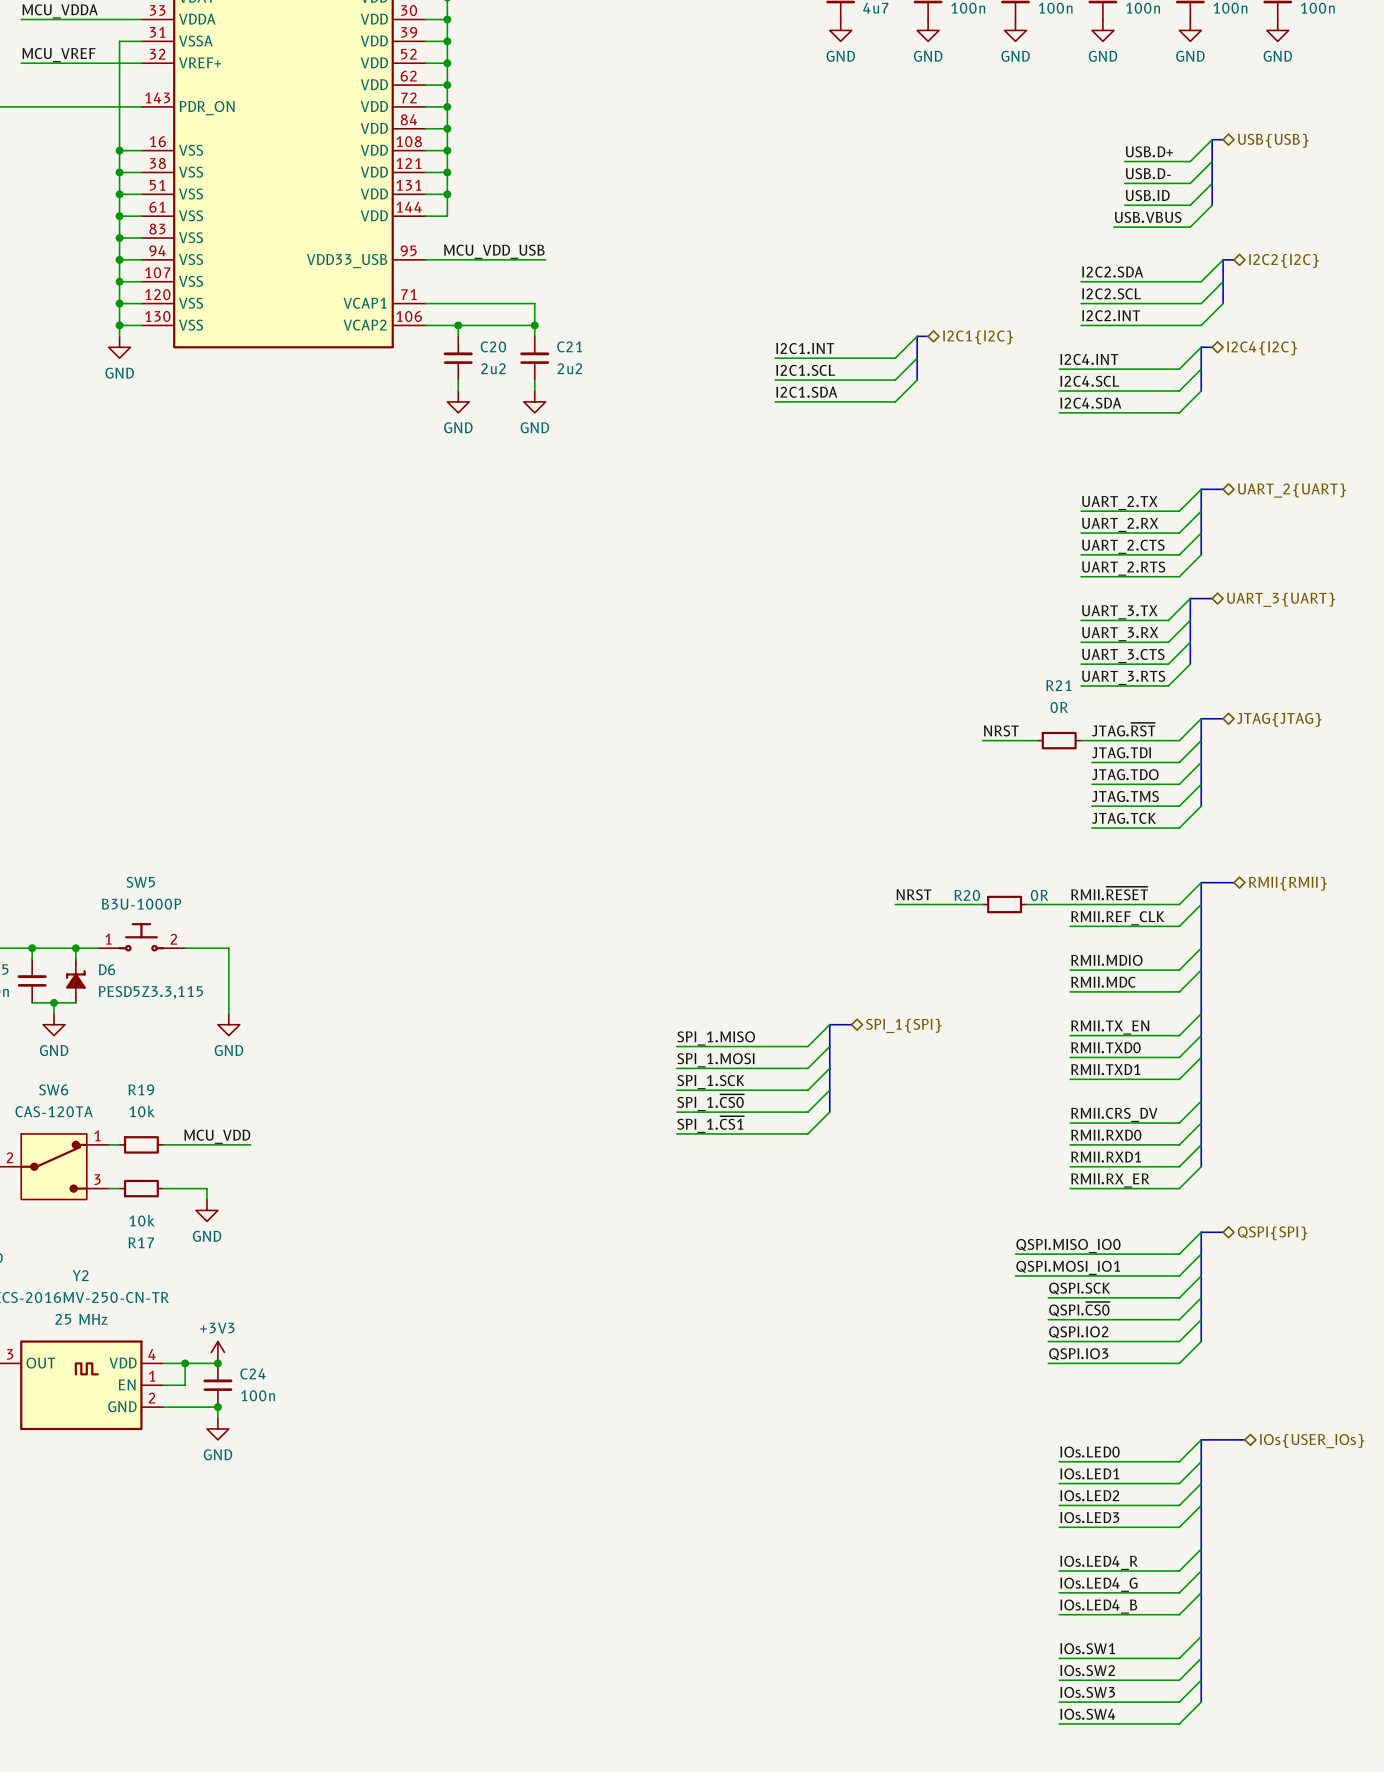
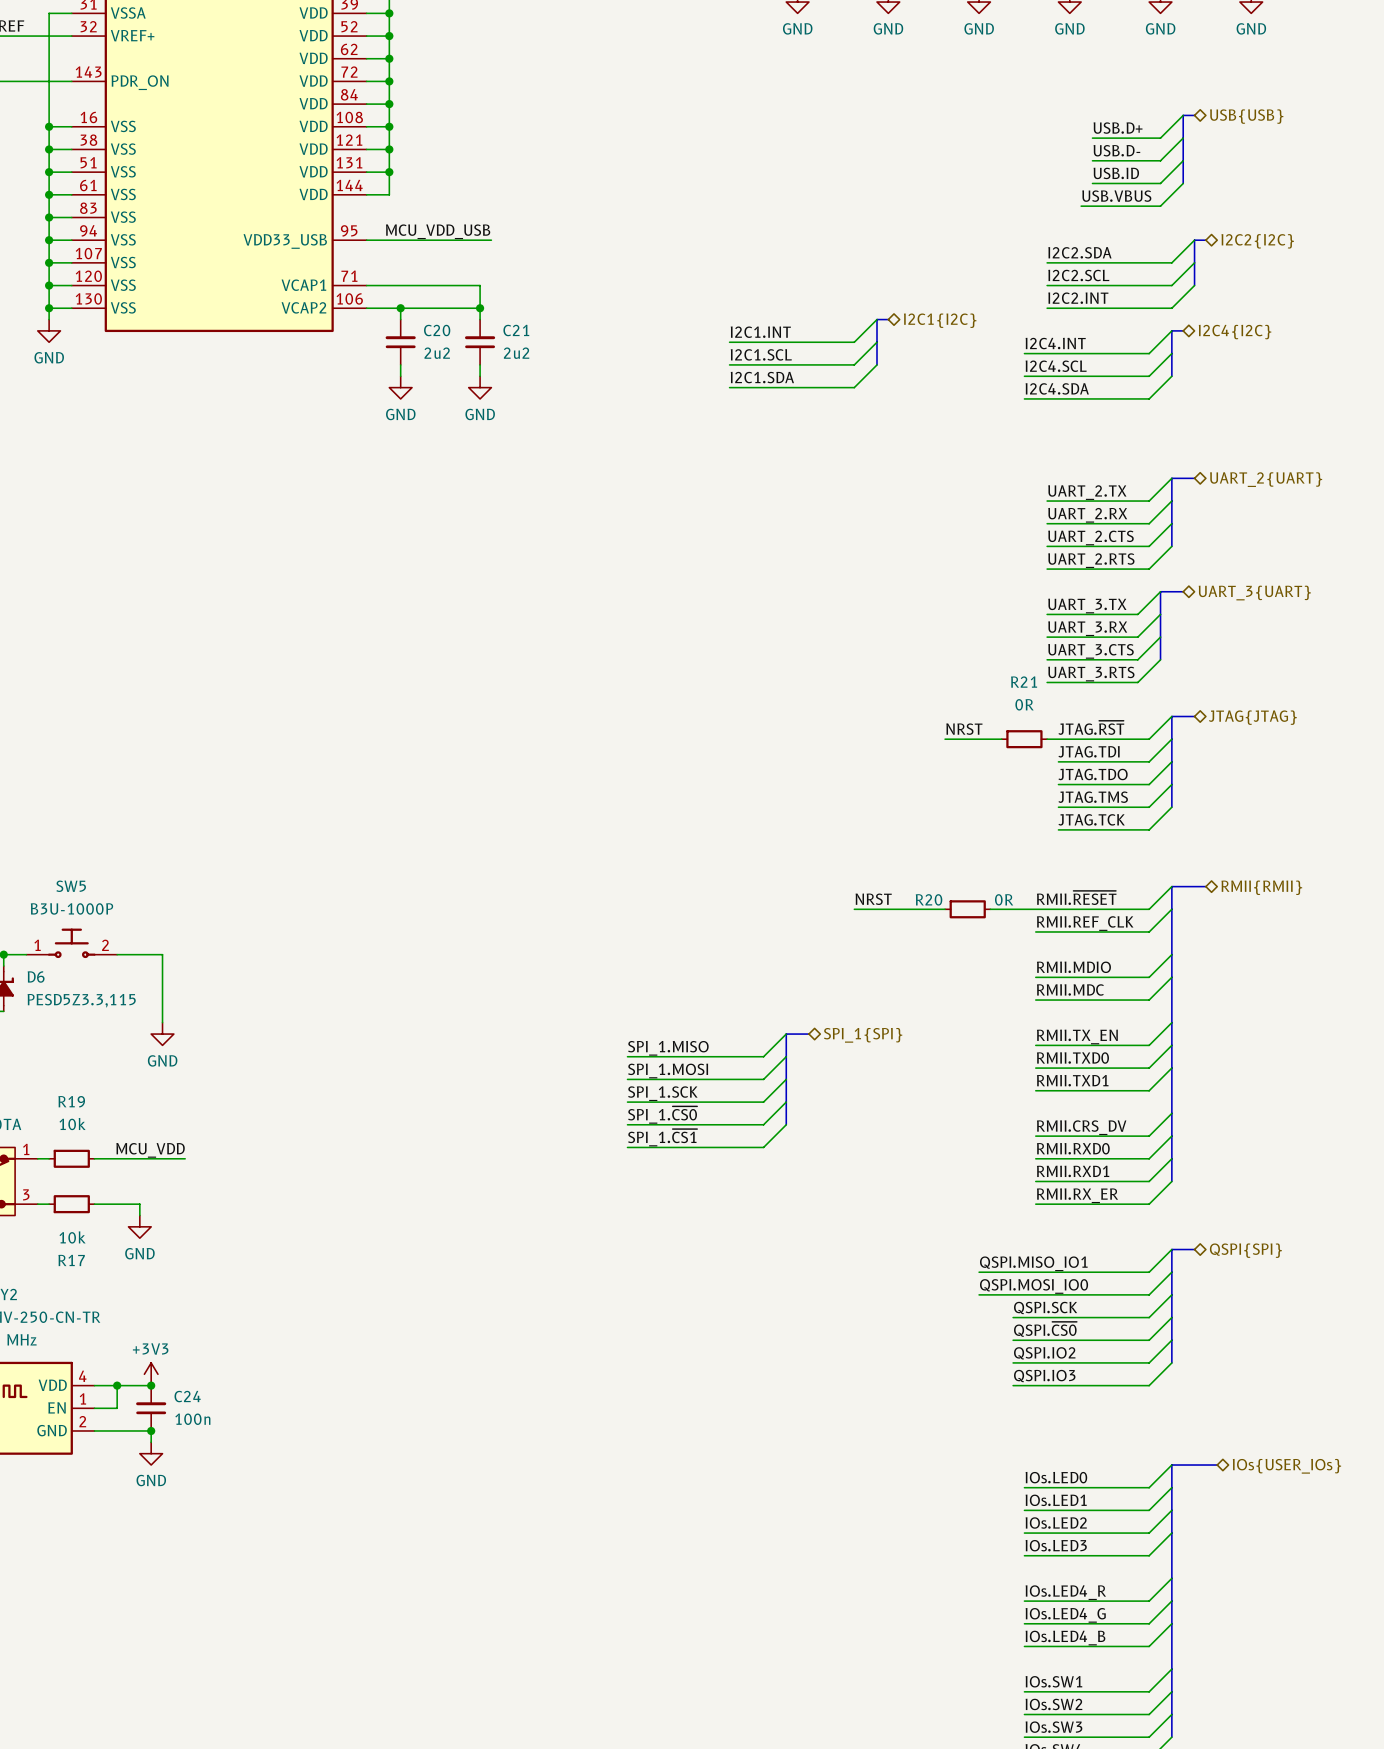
label: QSPI.MISO_IO0 (1068, 1246) -> QSPI.MISO_IO1 (1033, 1263)
label: QSPI.MOSI_IO1 (1068, 1267) -> QSPI.MOSI_IO0 (1034, 1286)

